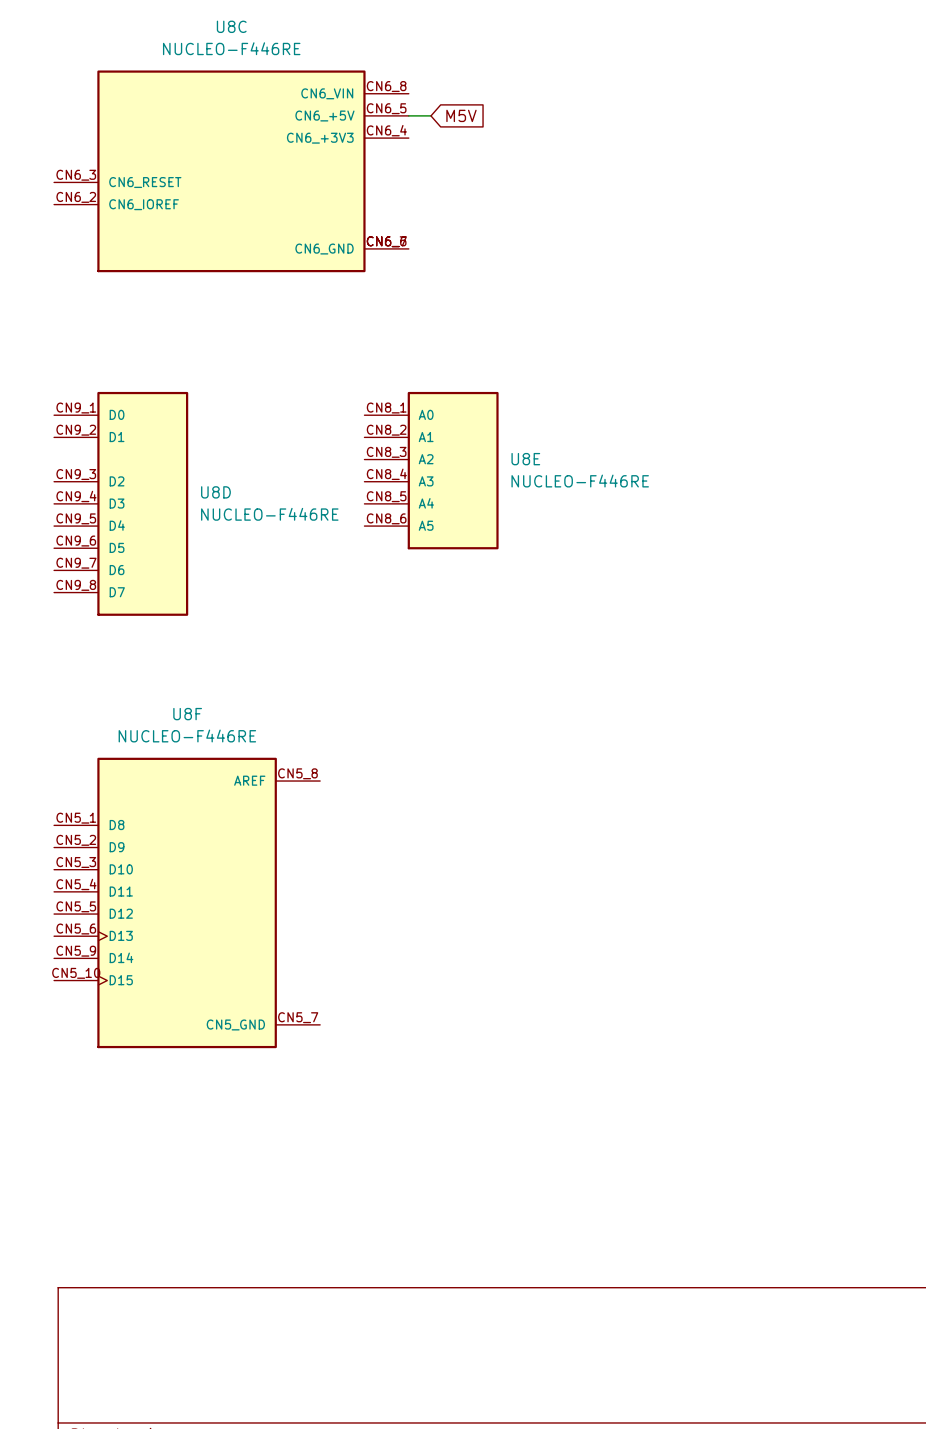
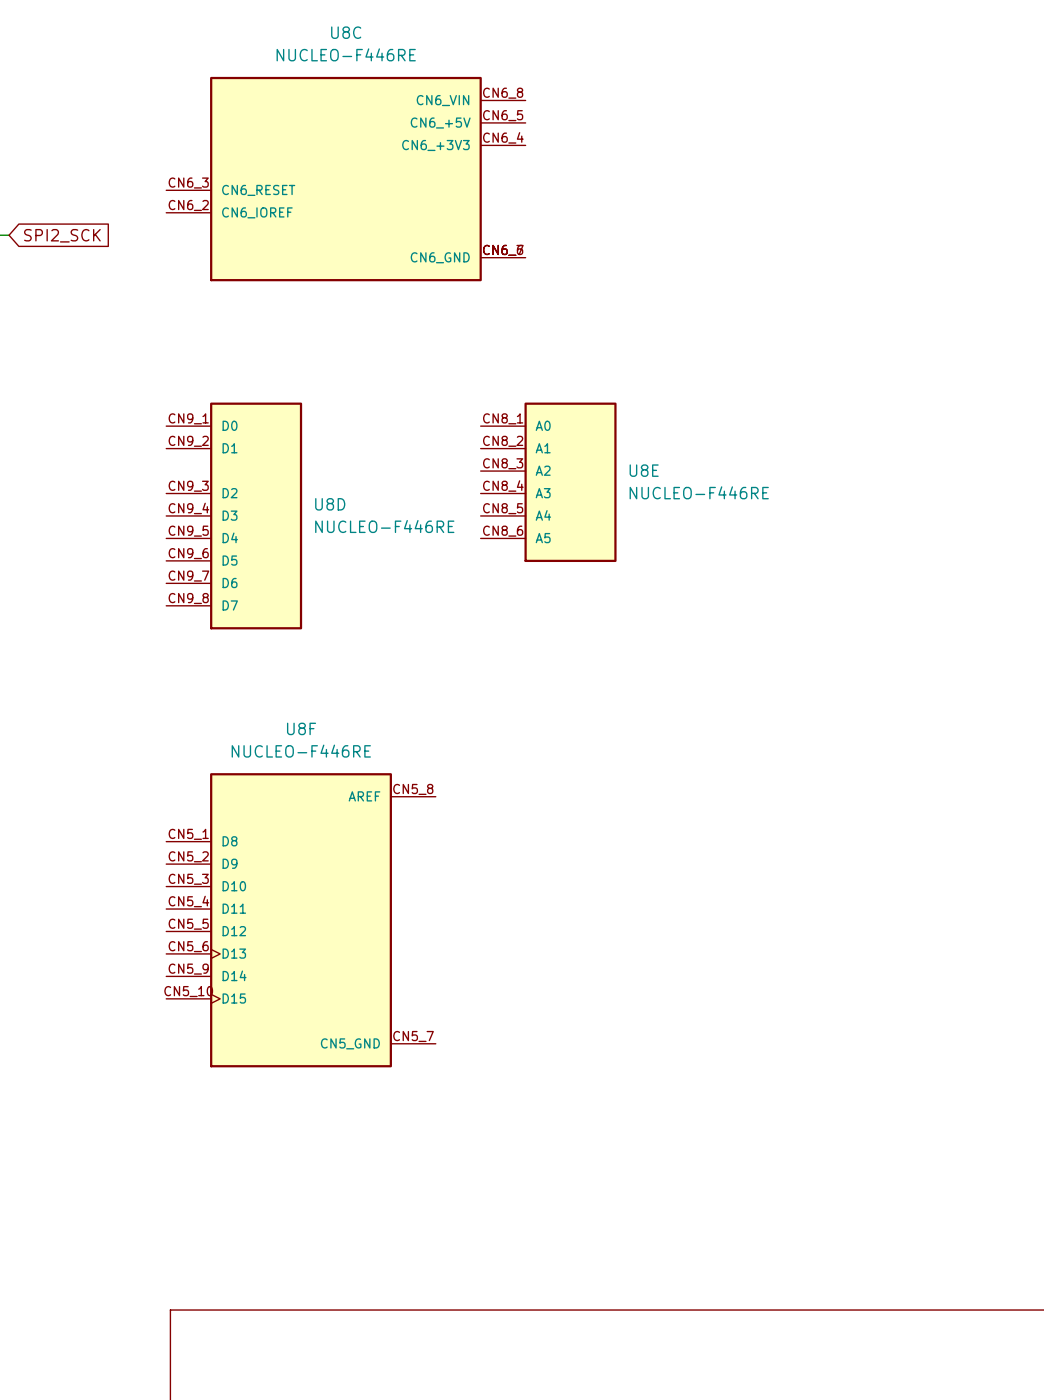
wire: (408, 115) (430, 115) -> none
global label: M5V (461, 115) -> none

